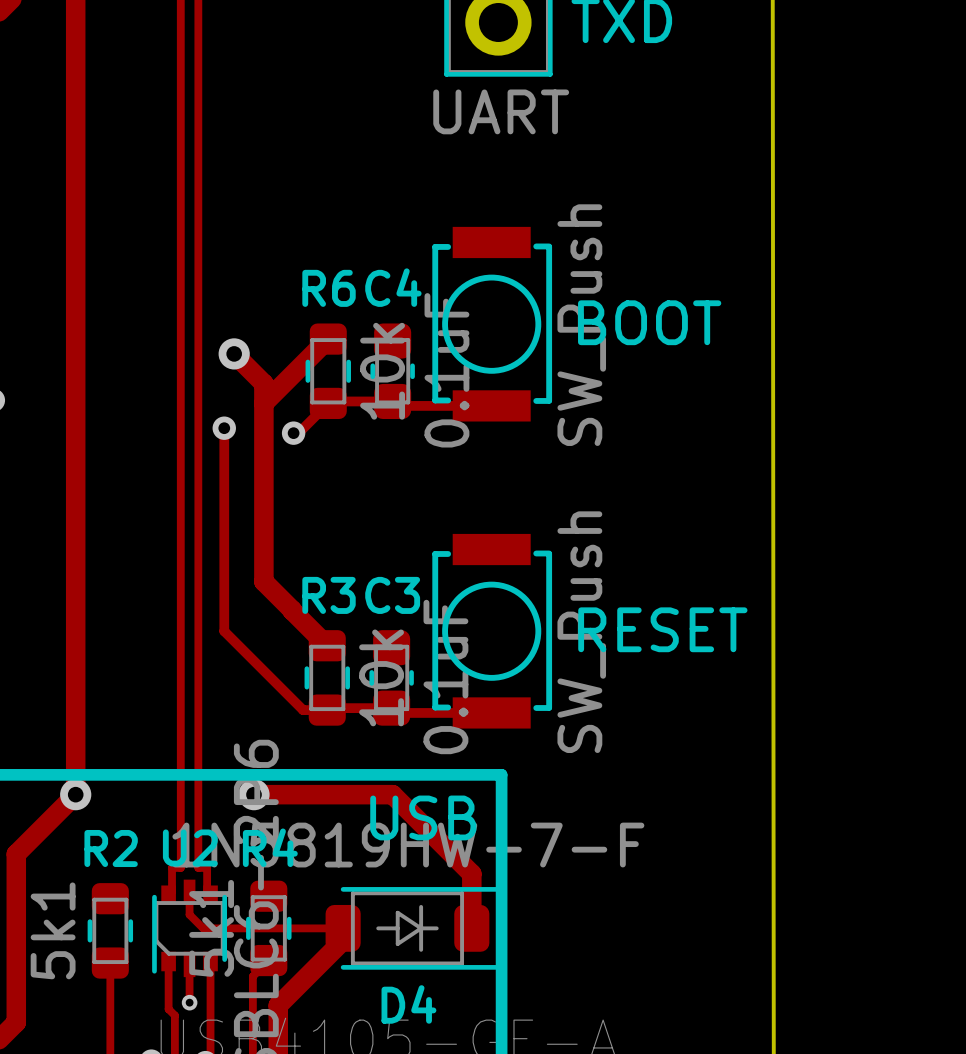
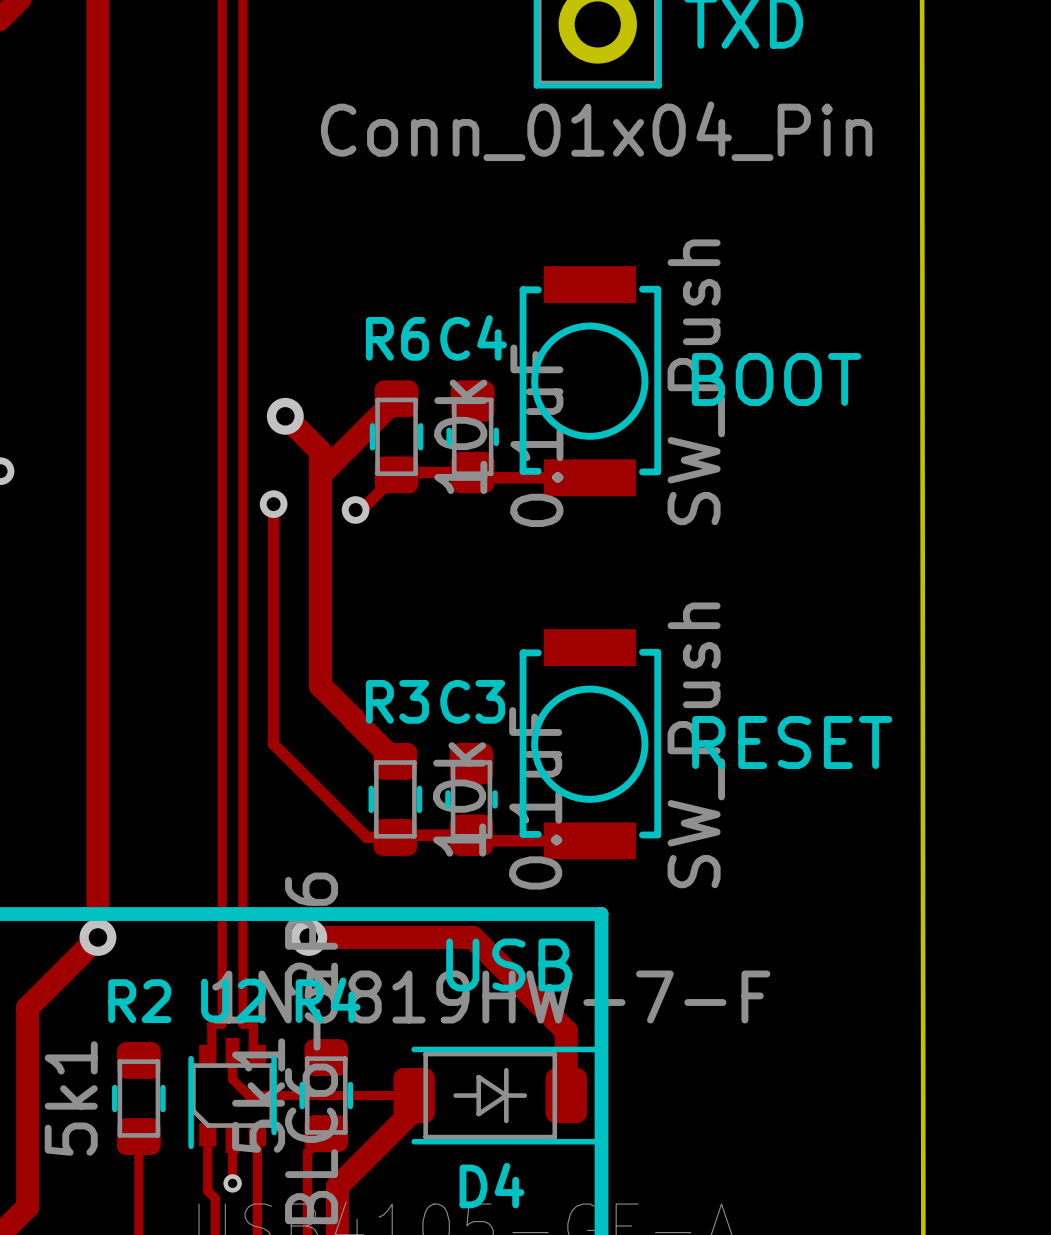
part value: UART (501, 111) -> Conn_01x04_Pin (596, 131)

